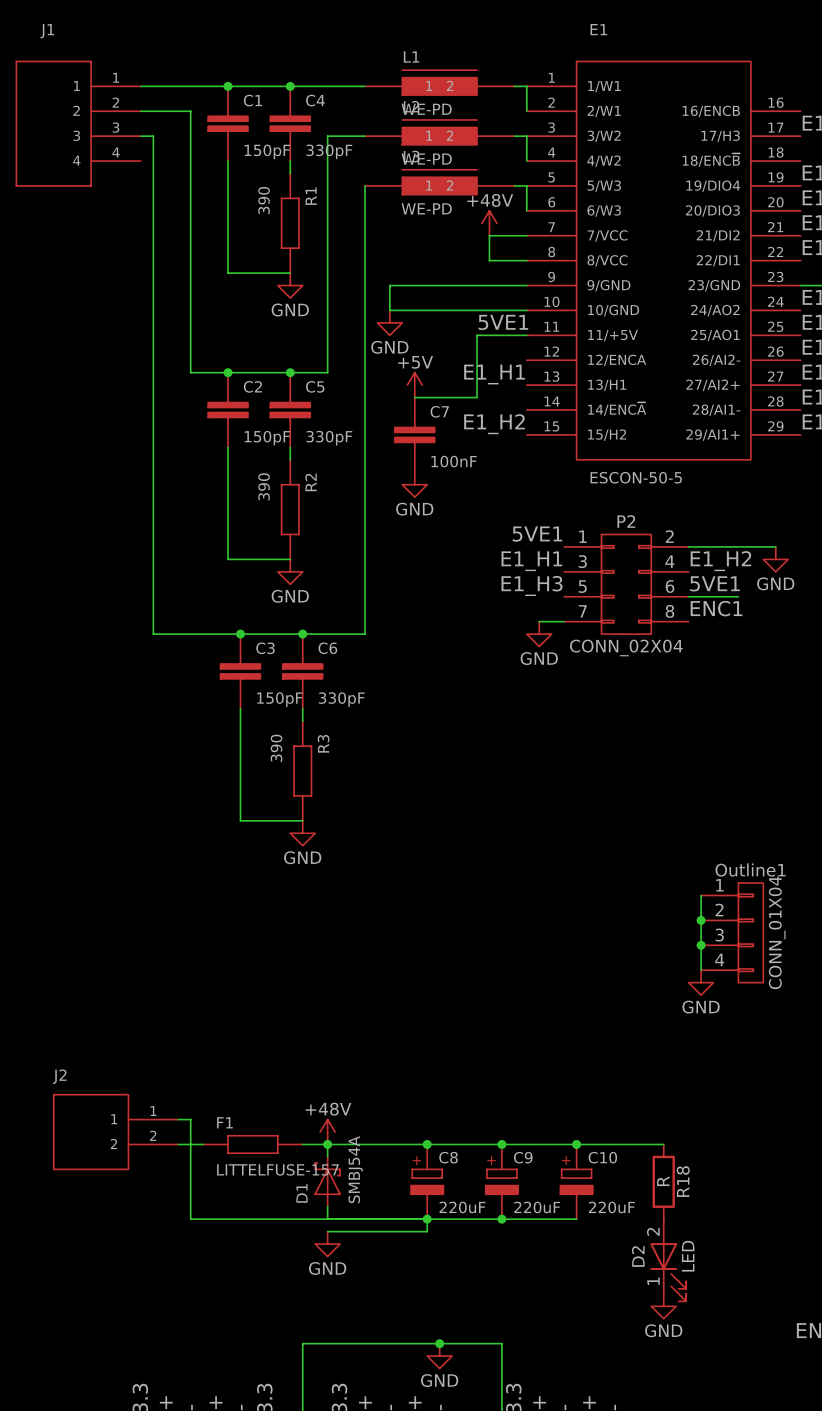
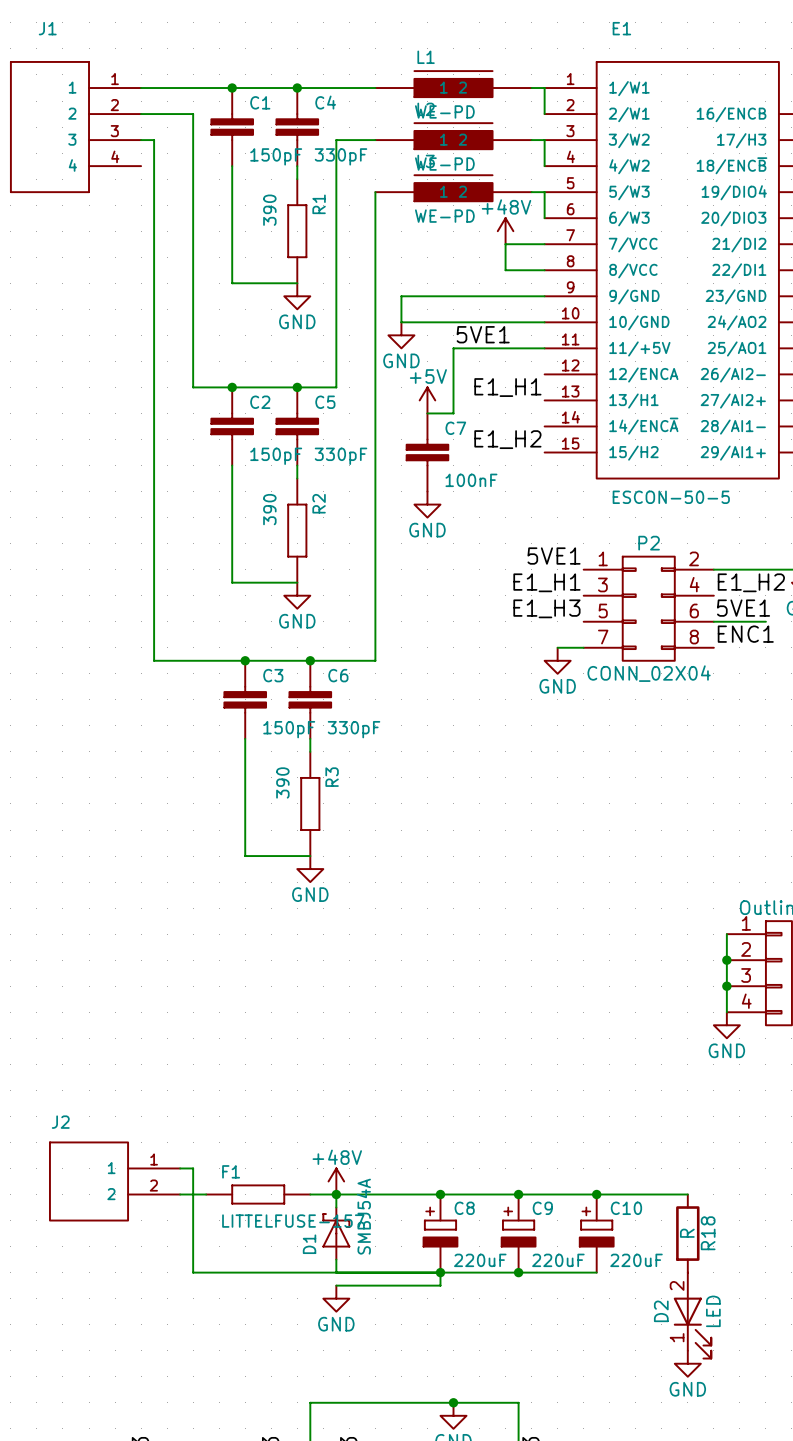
label position: 5VE1 (503, 322) -> 5VE1 (483, 334)
wire: (477, 335) (477, 397) (439, 397) -> (492, 348) (453, 348) (453, 413)

